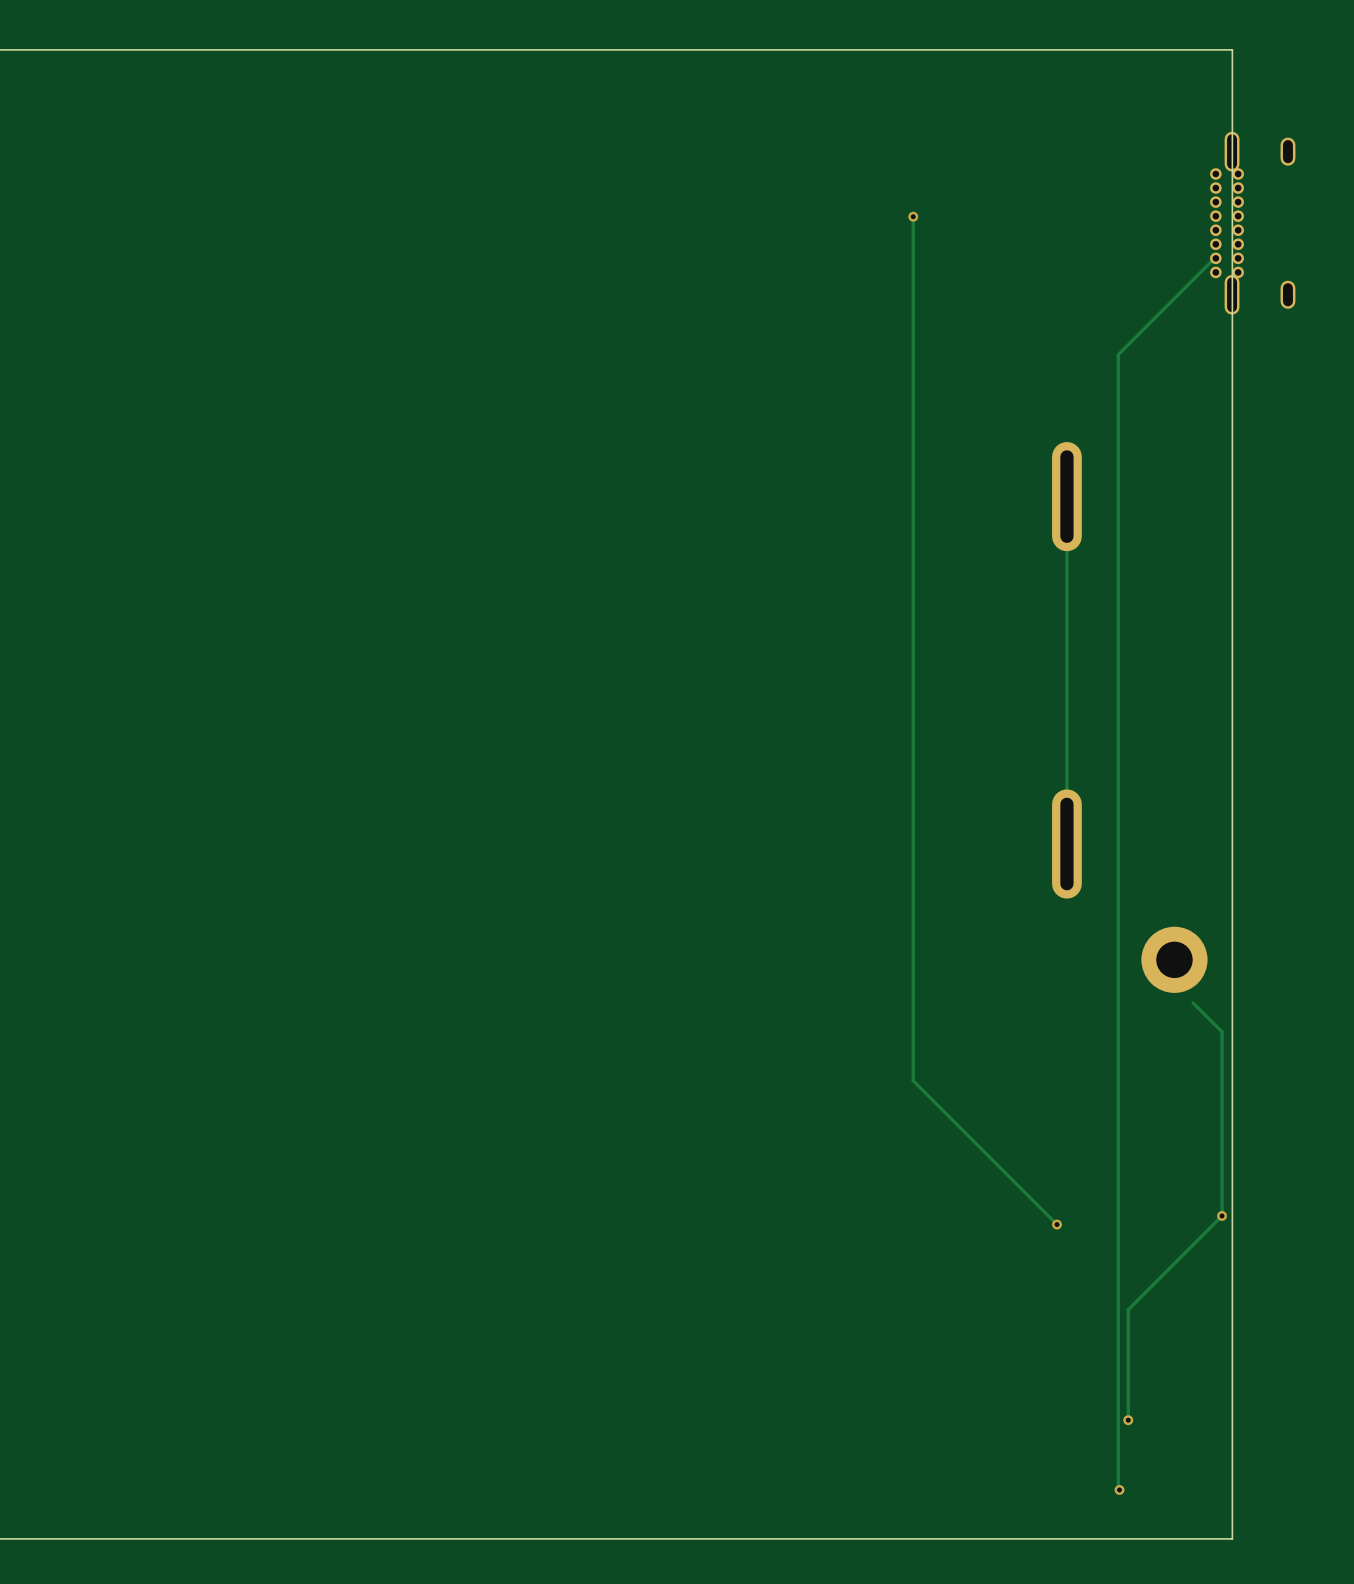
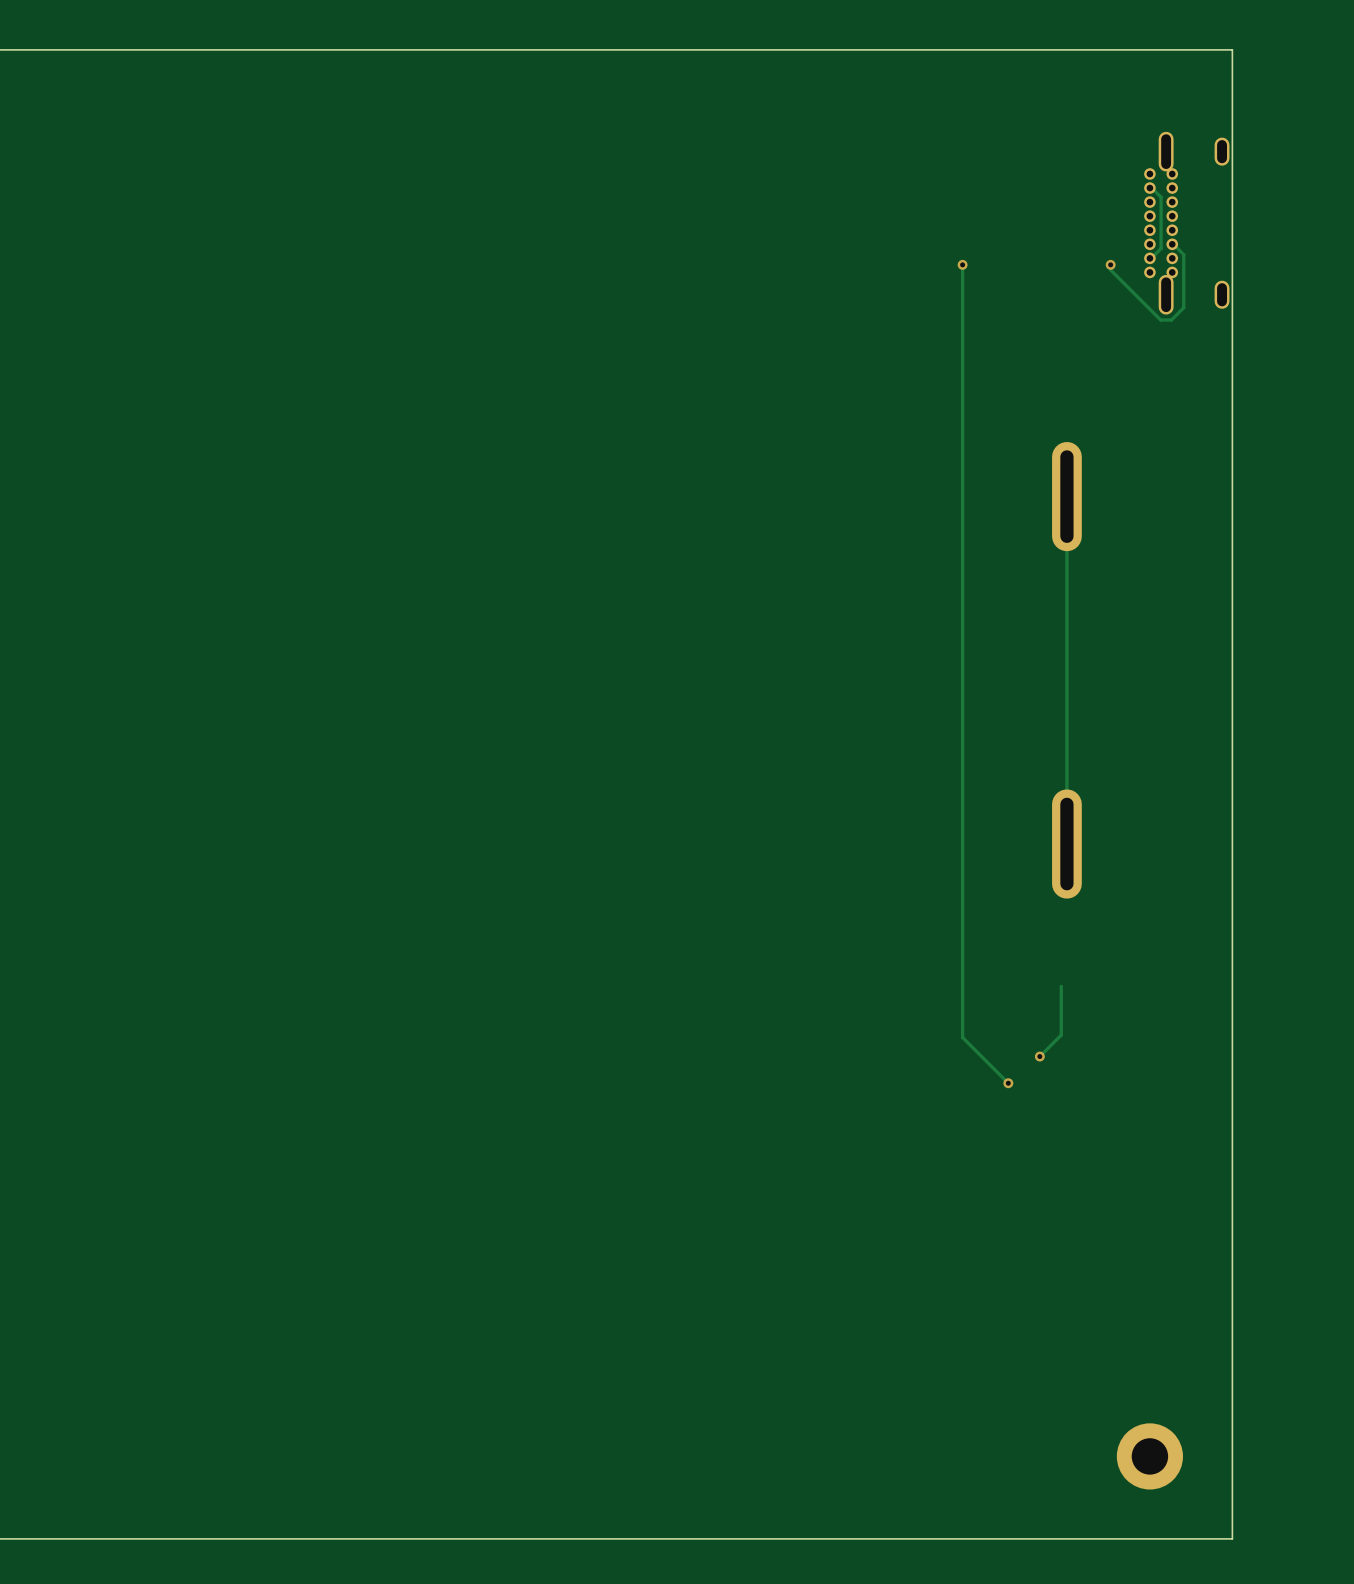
track: none -> (1149, 188) (1161, 197) (1161, 248) (1149, 258)
track: (913, 216) (913, 1080) (1057, 1224) -> none
via position: (913, 216) -> (962, 264)
part position: (1252, 223) -> (1186, 223)
track: none -> (1172, 244) (1183, 254) (1183, 307) (1171, 320) (1160, 320) (1110, 270) (1110, 264)
track: (1215, 258) (1118, 354) (1119, 1489) -> none
track: none -> (962, 264) (962, 1037) (1008, 1083)
via: none -> (1110, 264)
part: (1174, 959) -> none
track: none -> (1061, 986) (1061, 1035) (1039, 1056)
track: (1193, 1002) (1222, 1031) (1222, 1215) (1128, 1309) (1128, 1420) -> none
via: none -> (1039, 1056)
via: none -> (1008, 1083)
via: (1222, 1215) -> none
via: (1057, 1224) -> none
via: (1128, 1420) -> none
part: none -> (1149, 1456)
via: (1119, 1489) -> none

